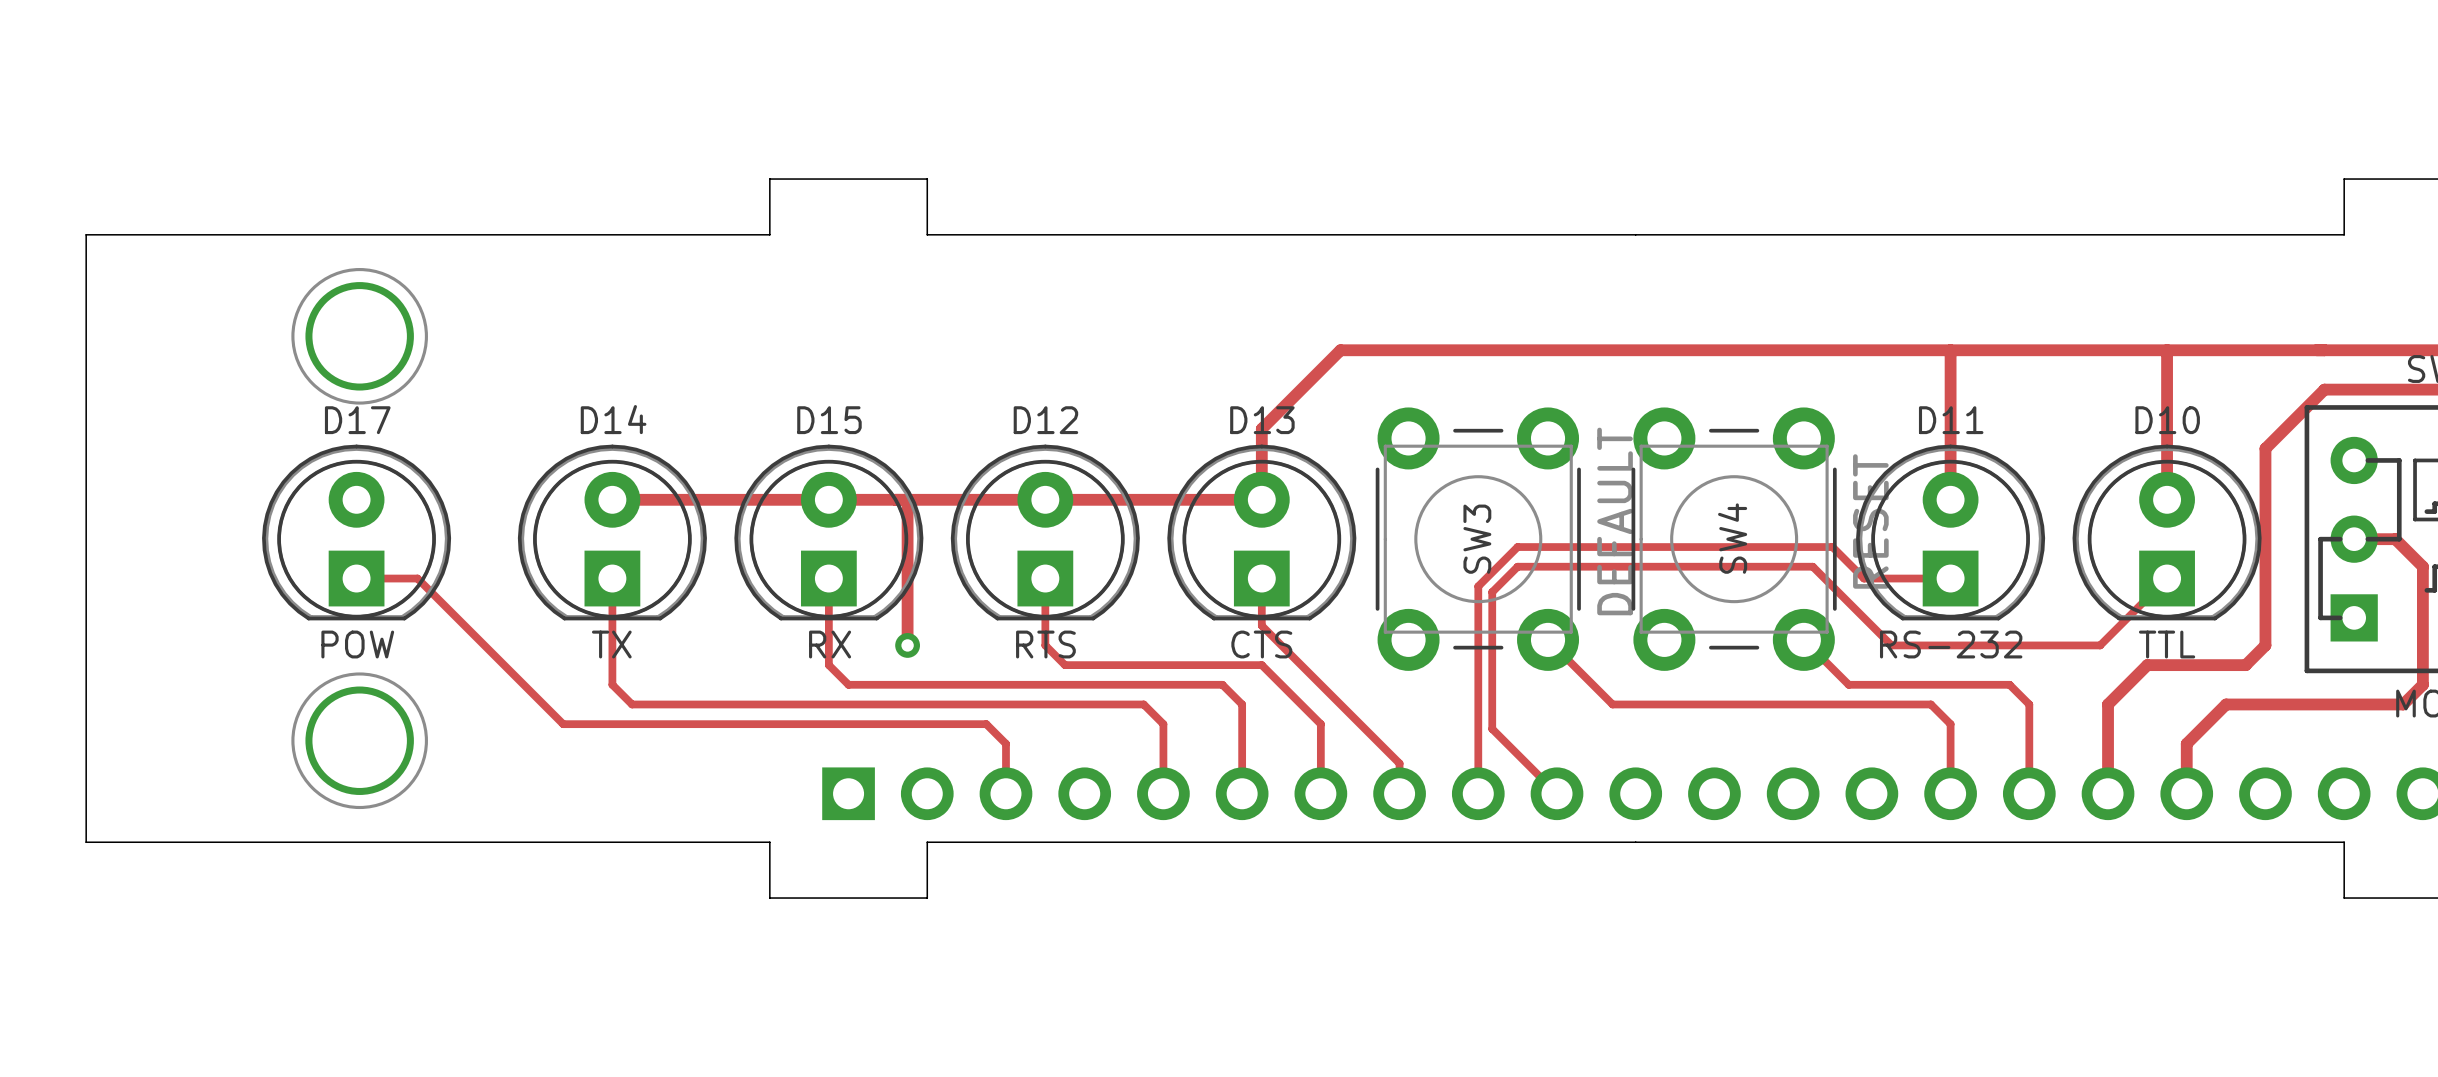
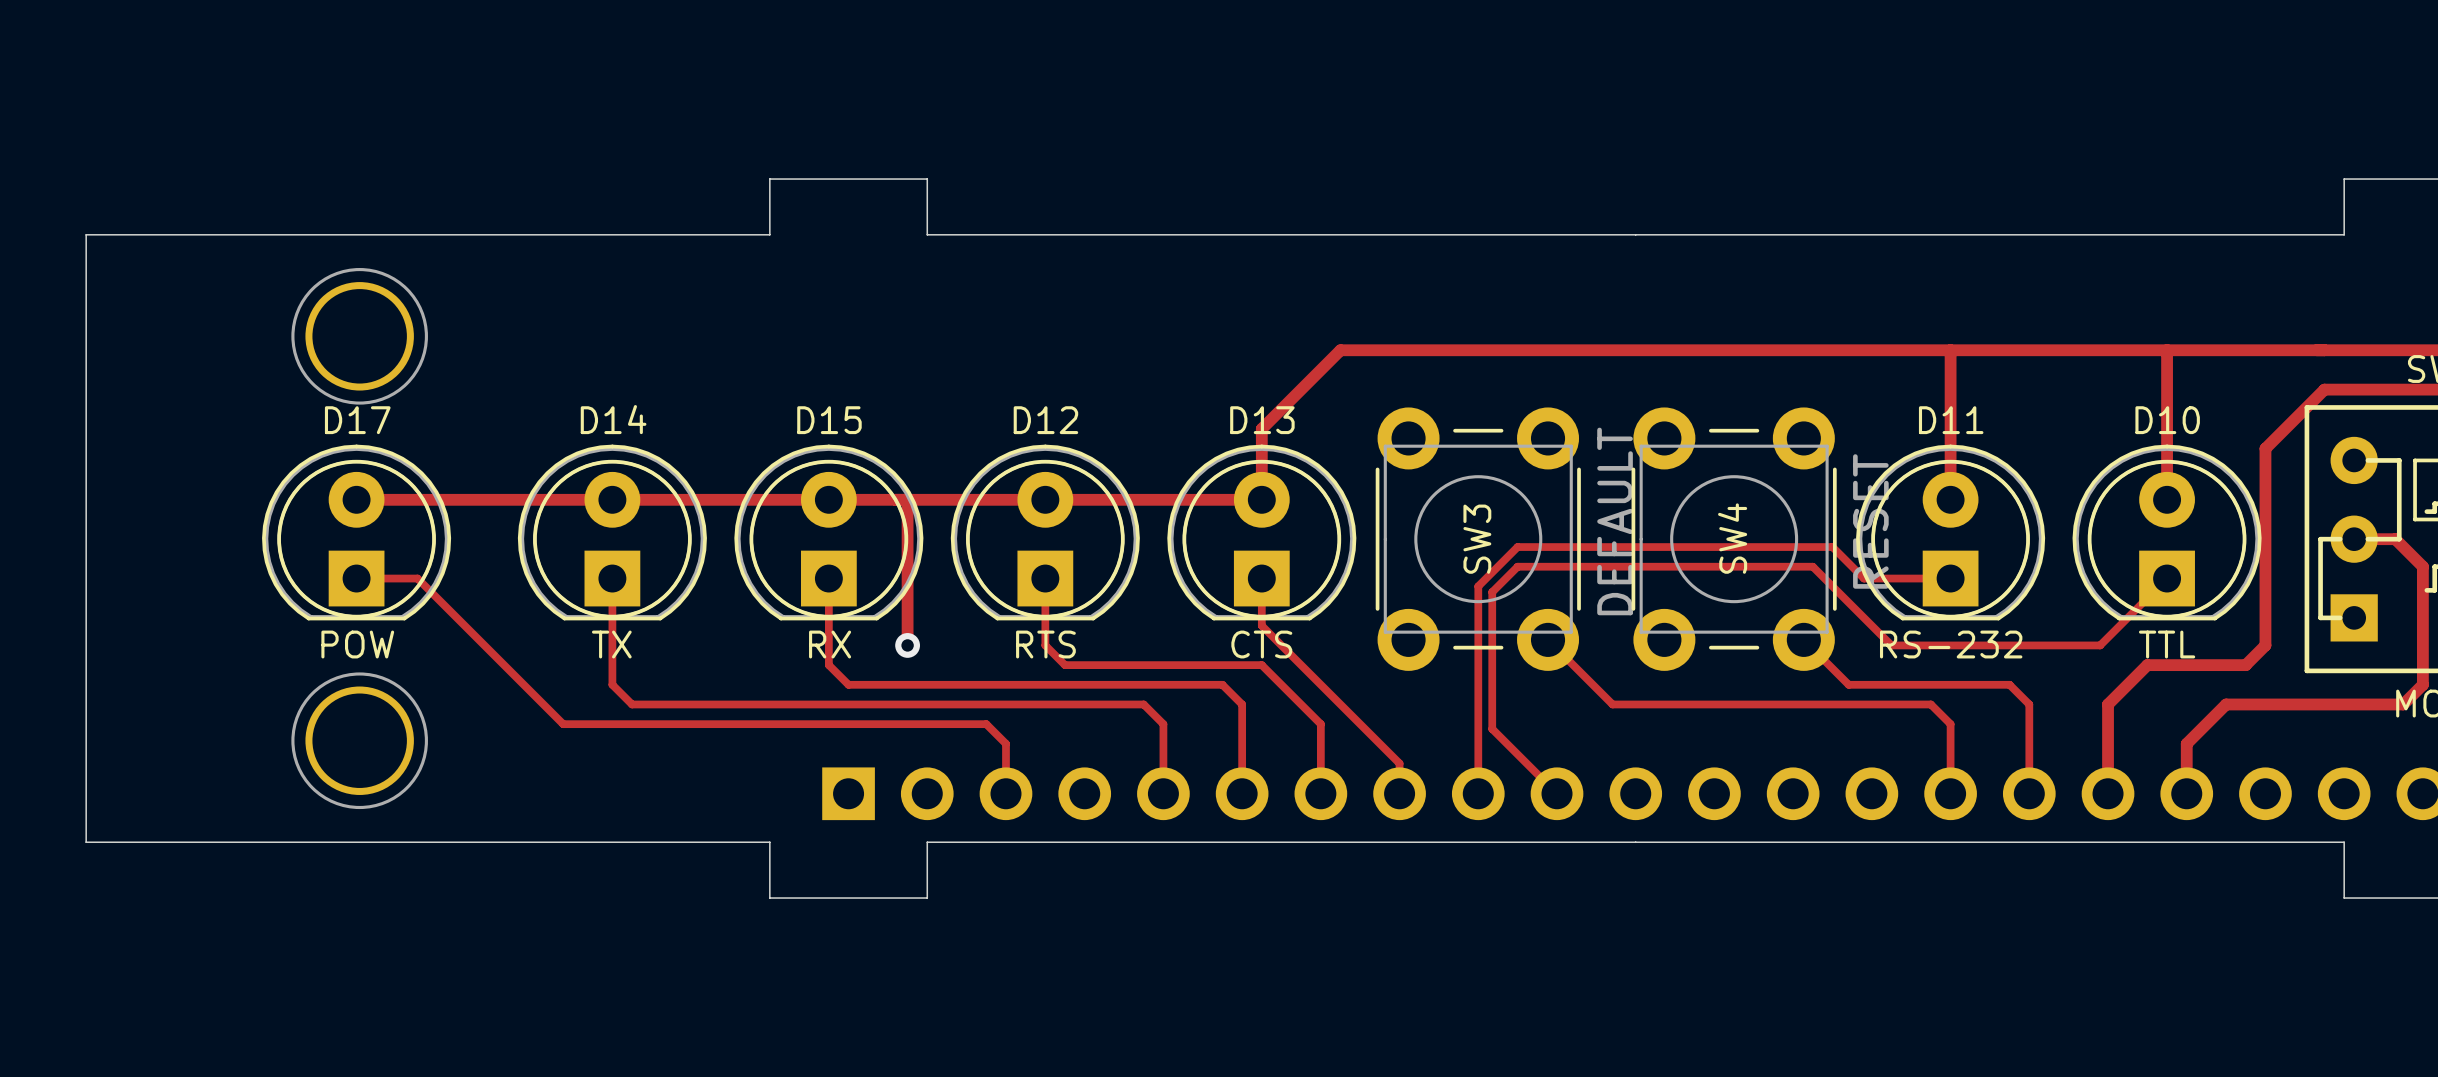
track: none -> (356, 499) (612, 499)

